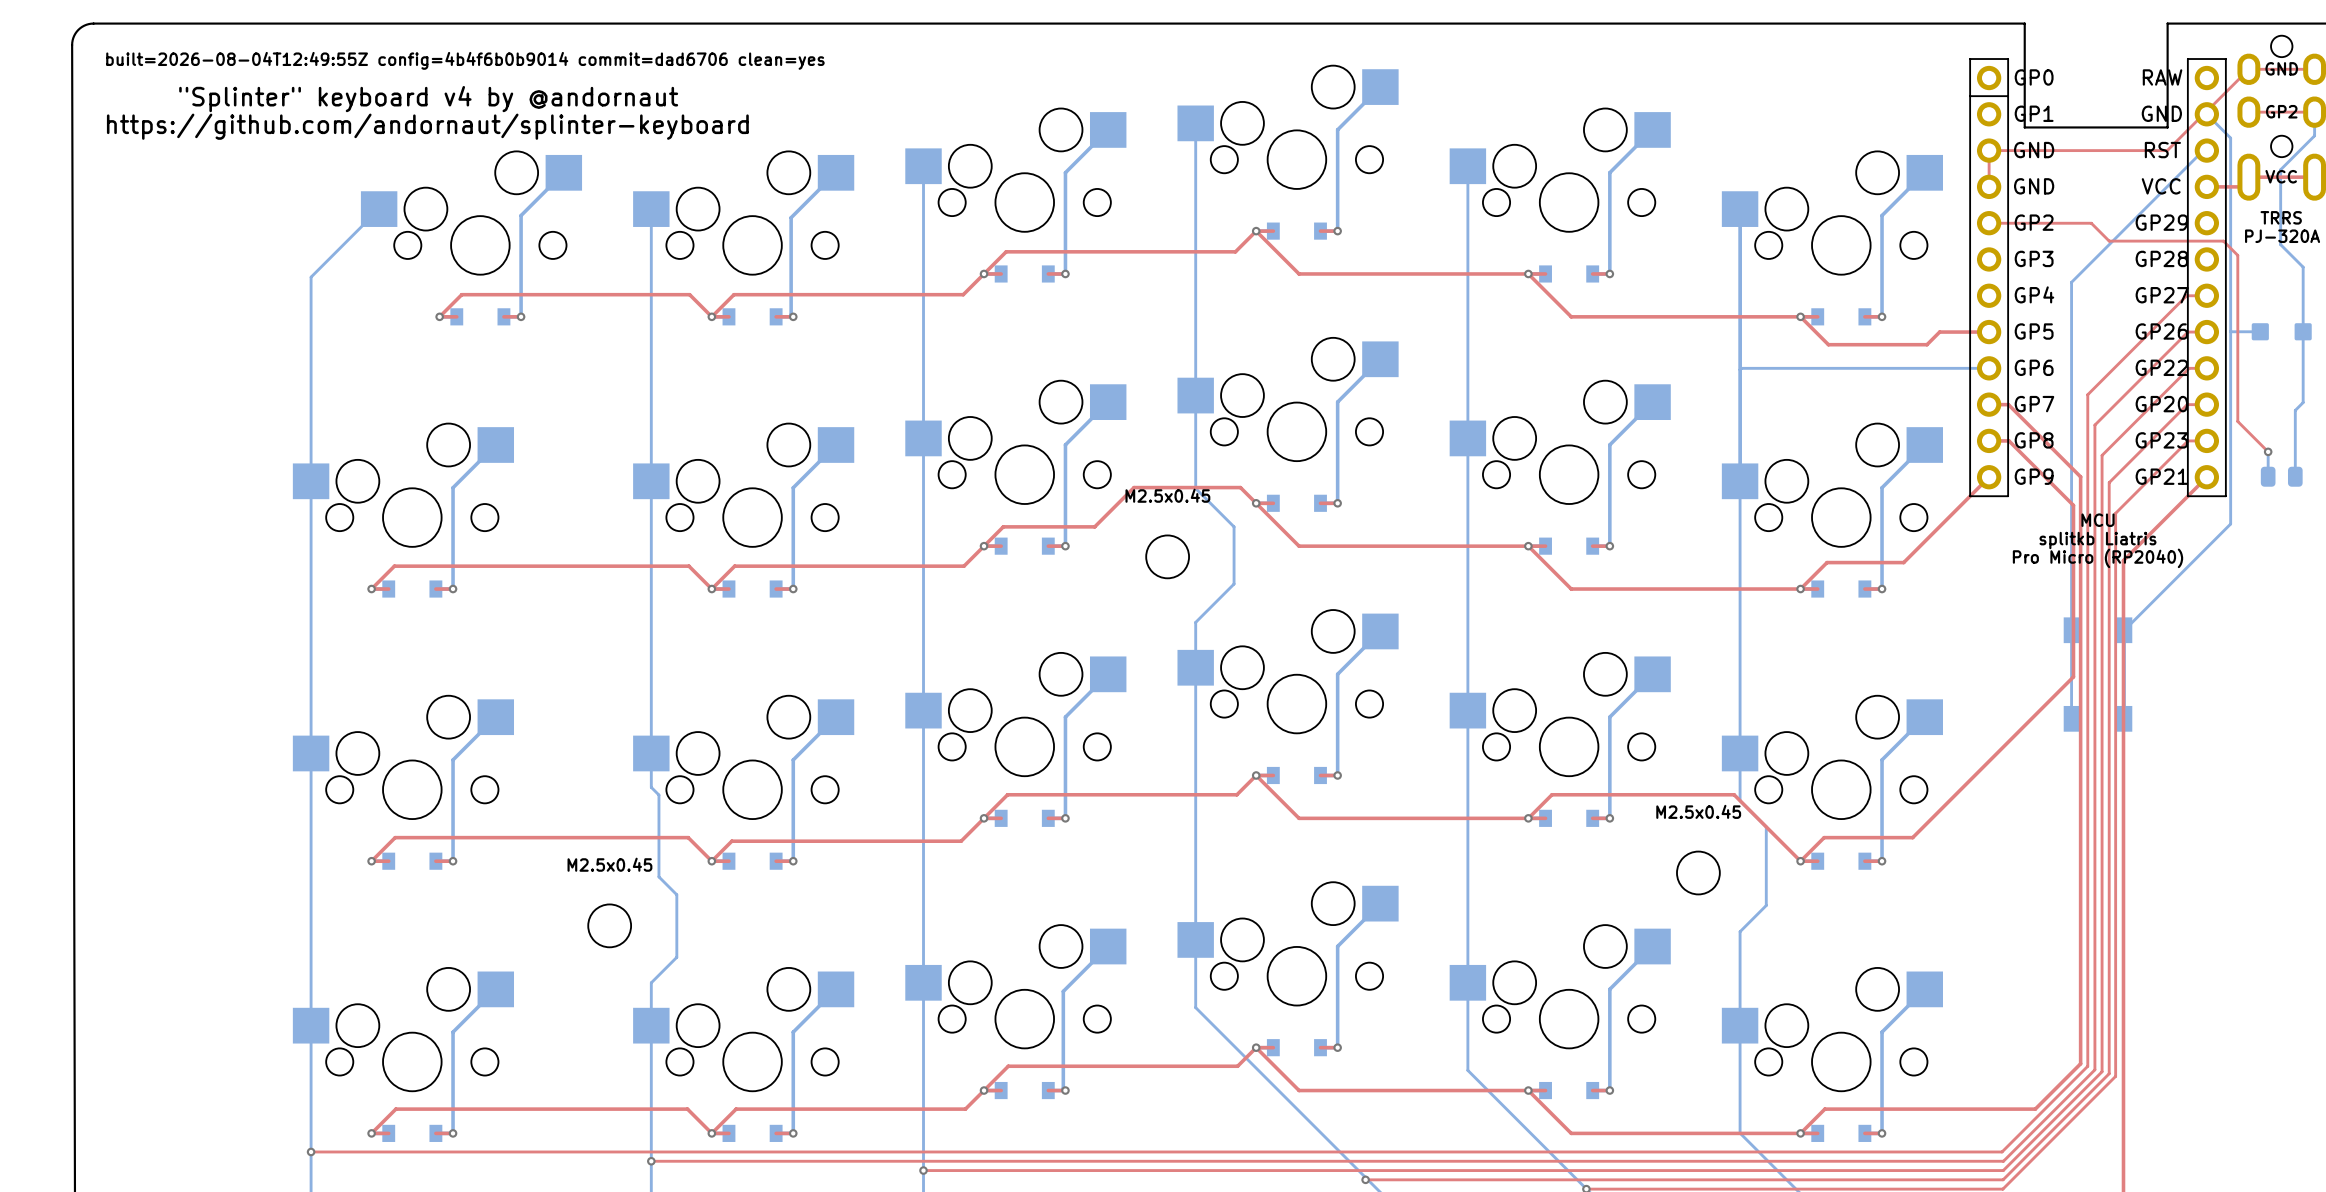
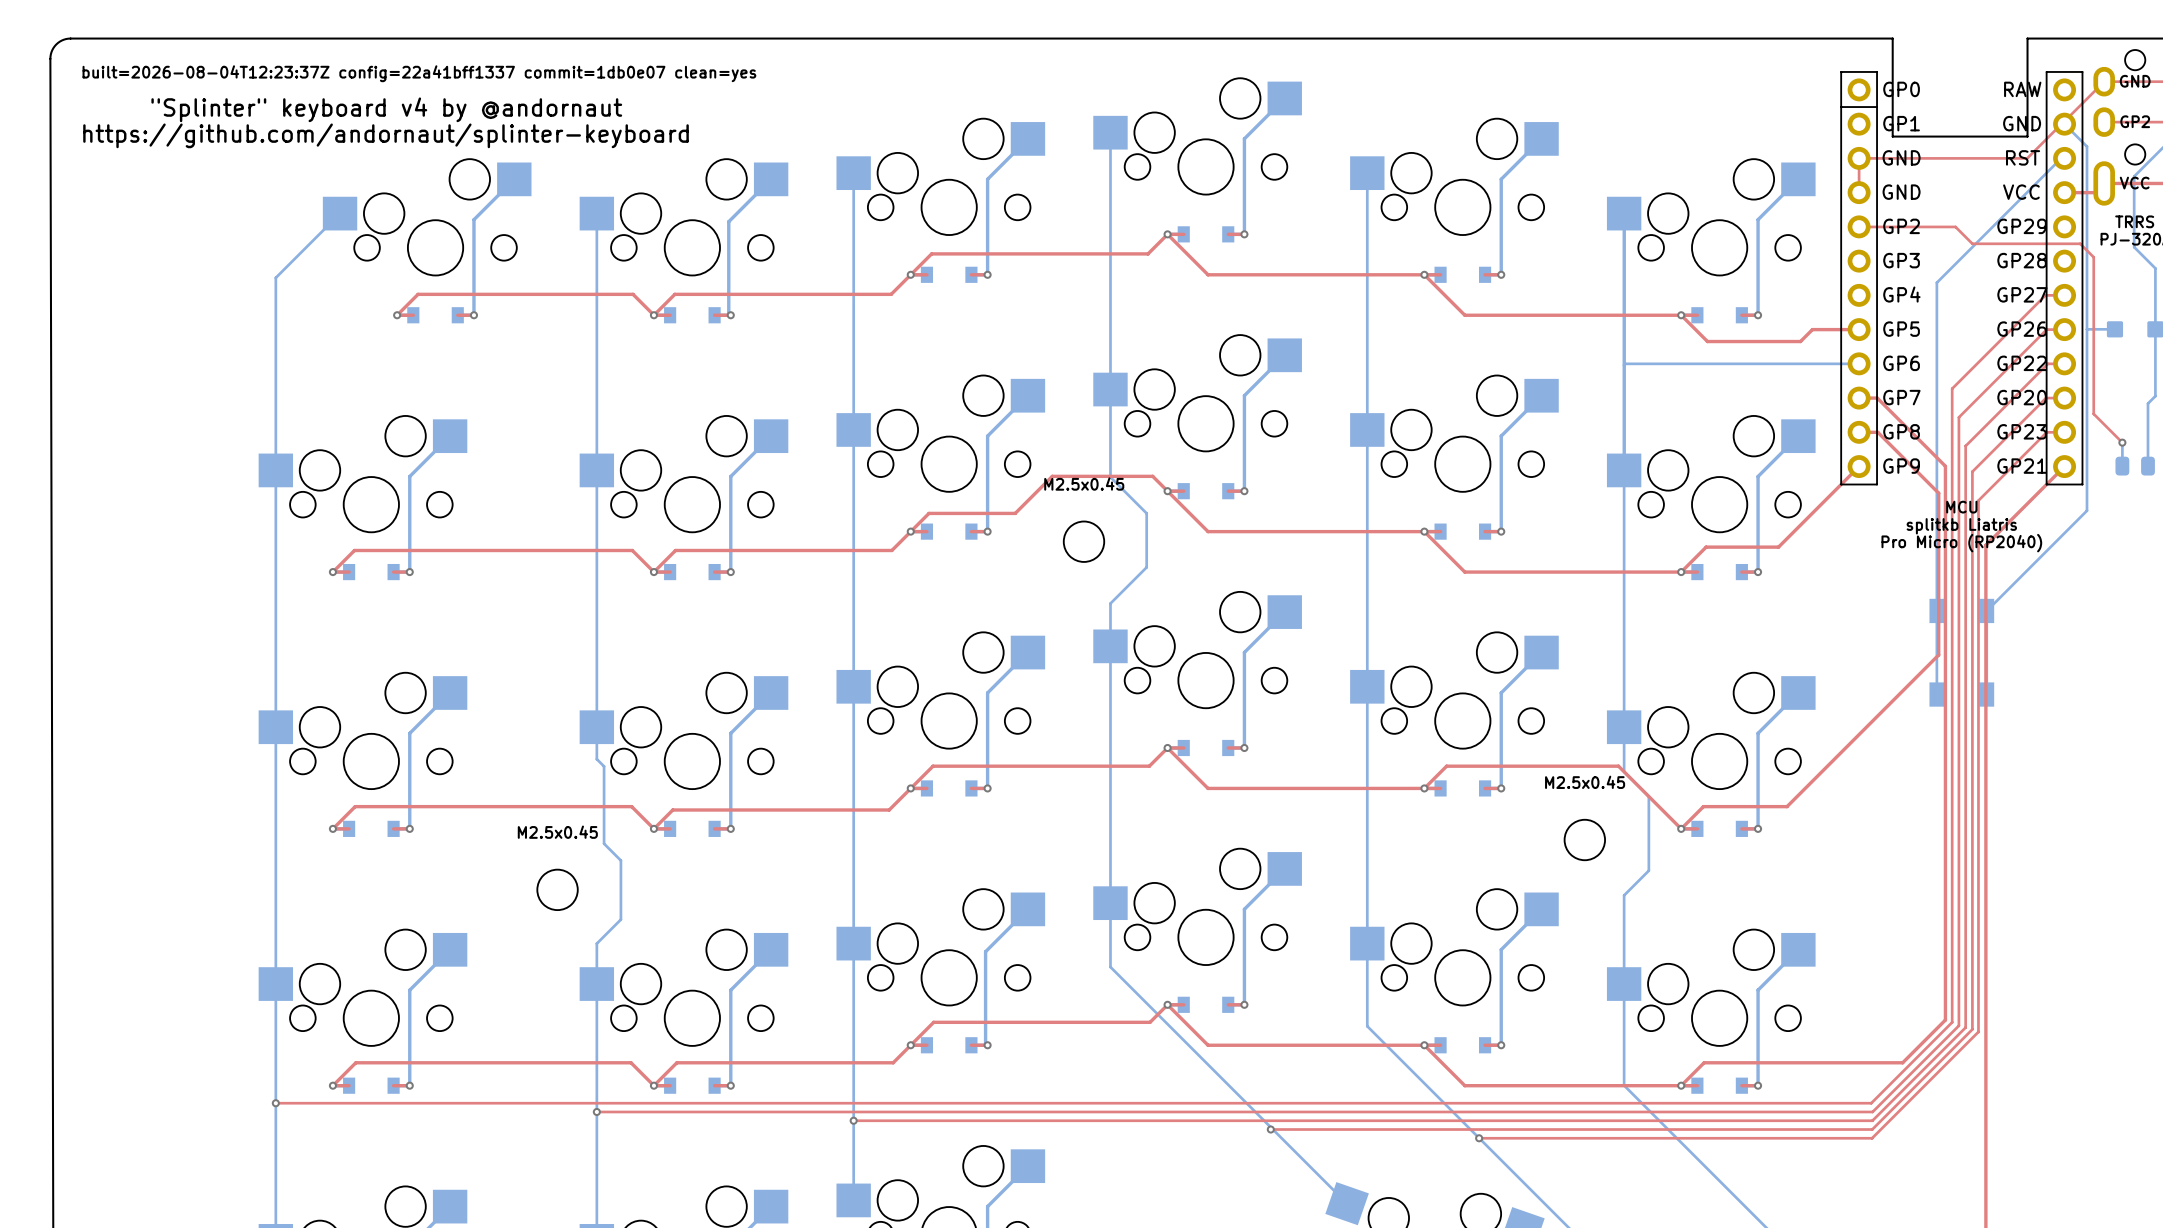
text: built=2026-08-04T12:49:55Z config=4b4f6b0b9014 commit=dad6706 clean=yes (465, 60) -> built=2026-08-04T12:23:37Z config=22a41bff1337 commit=1db0e07 clean=yes (419, 73)

